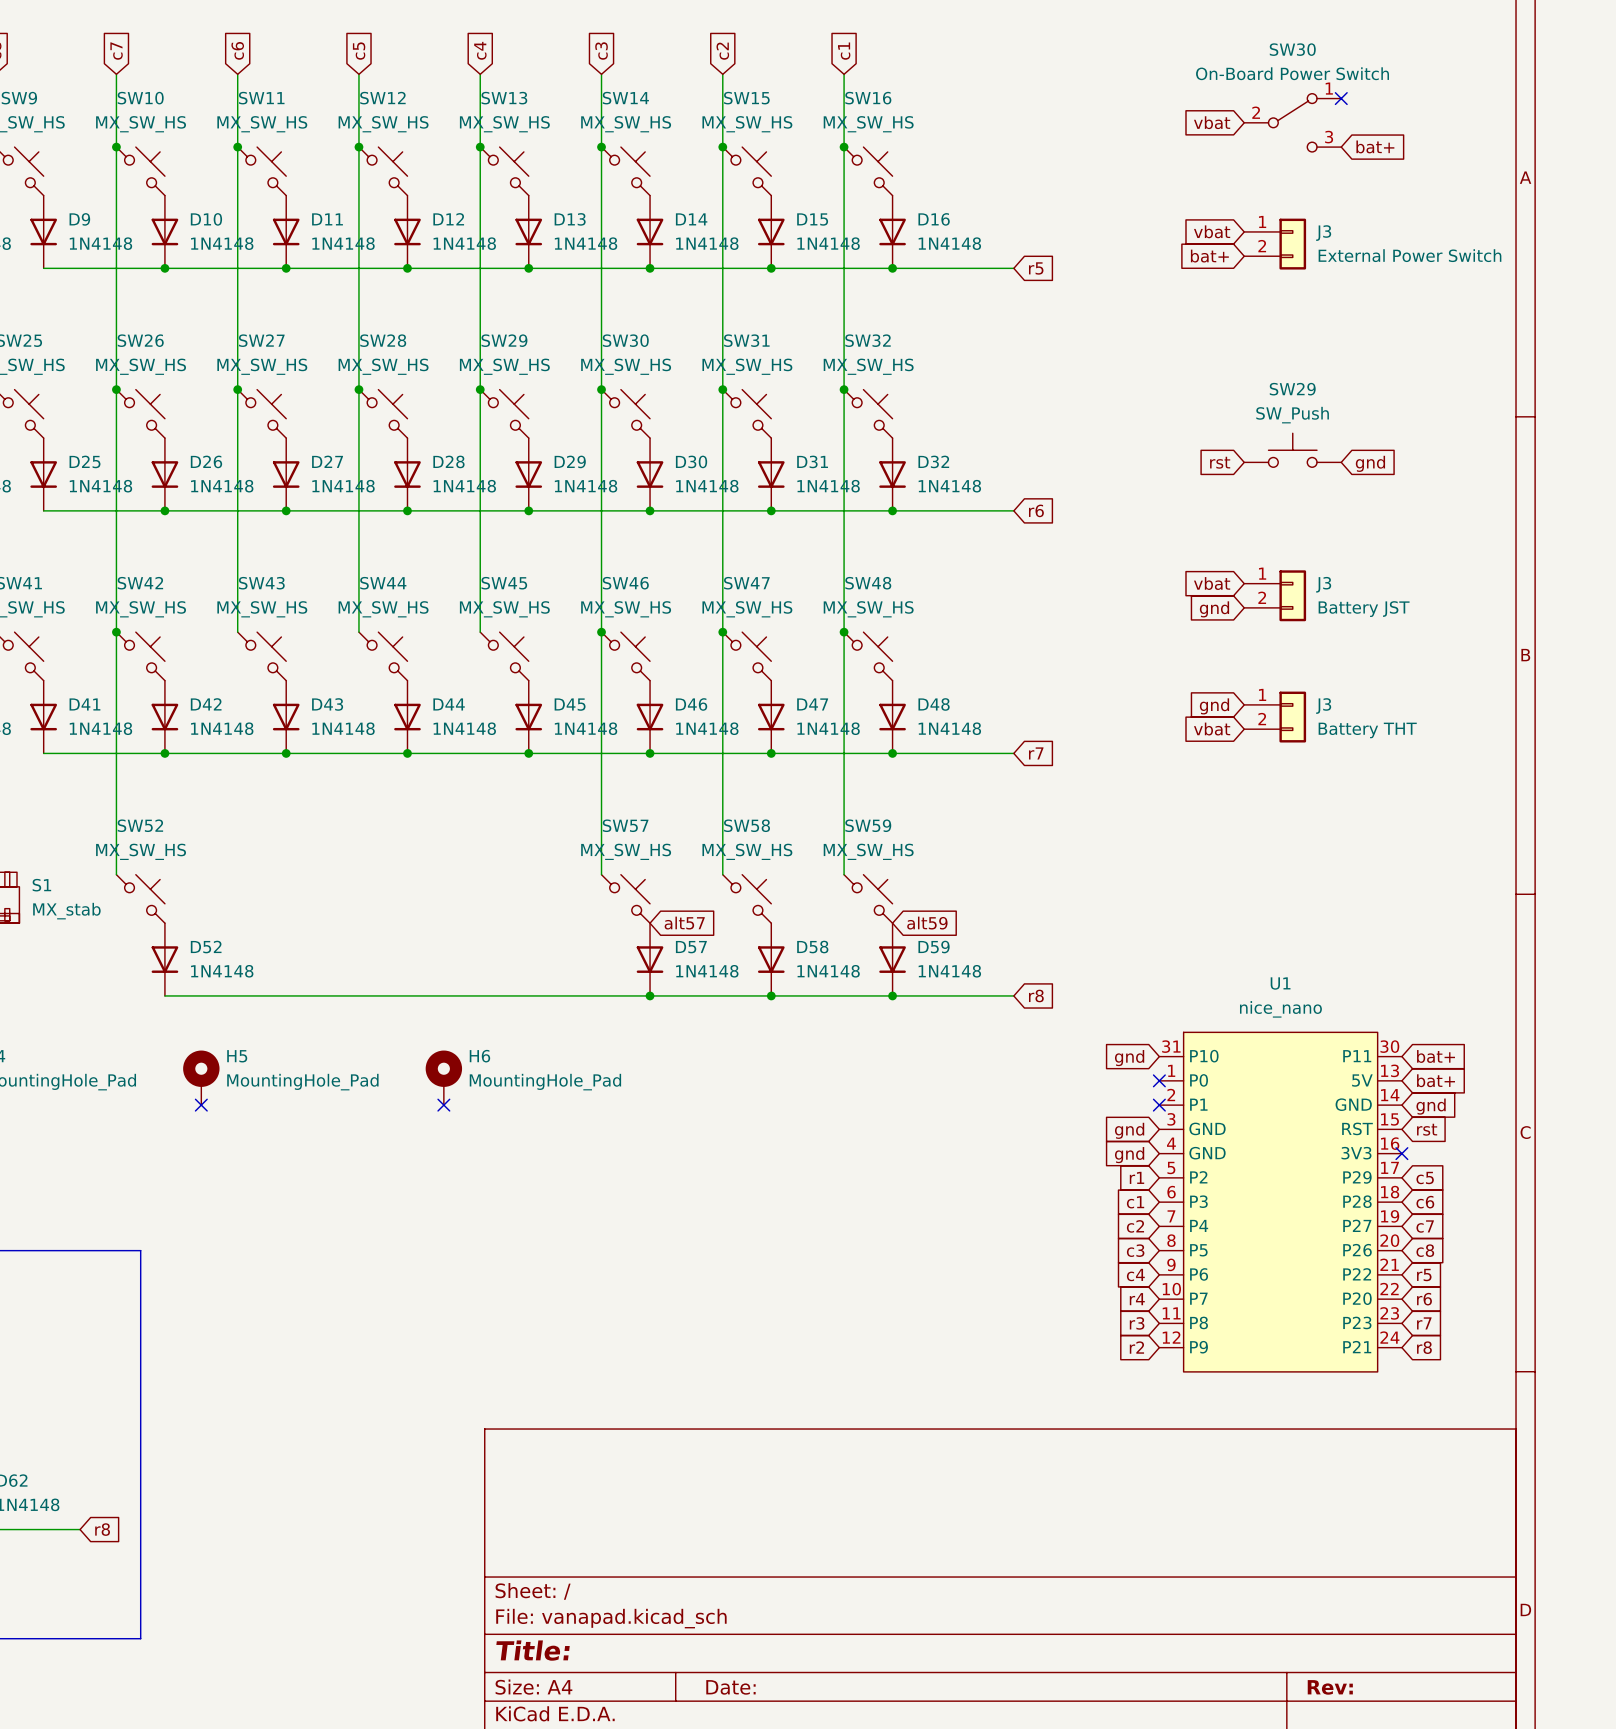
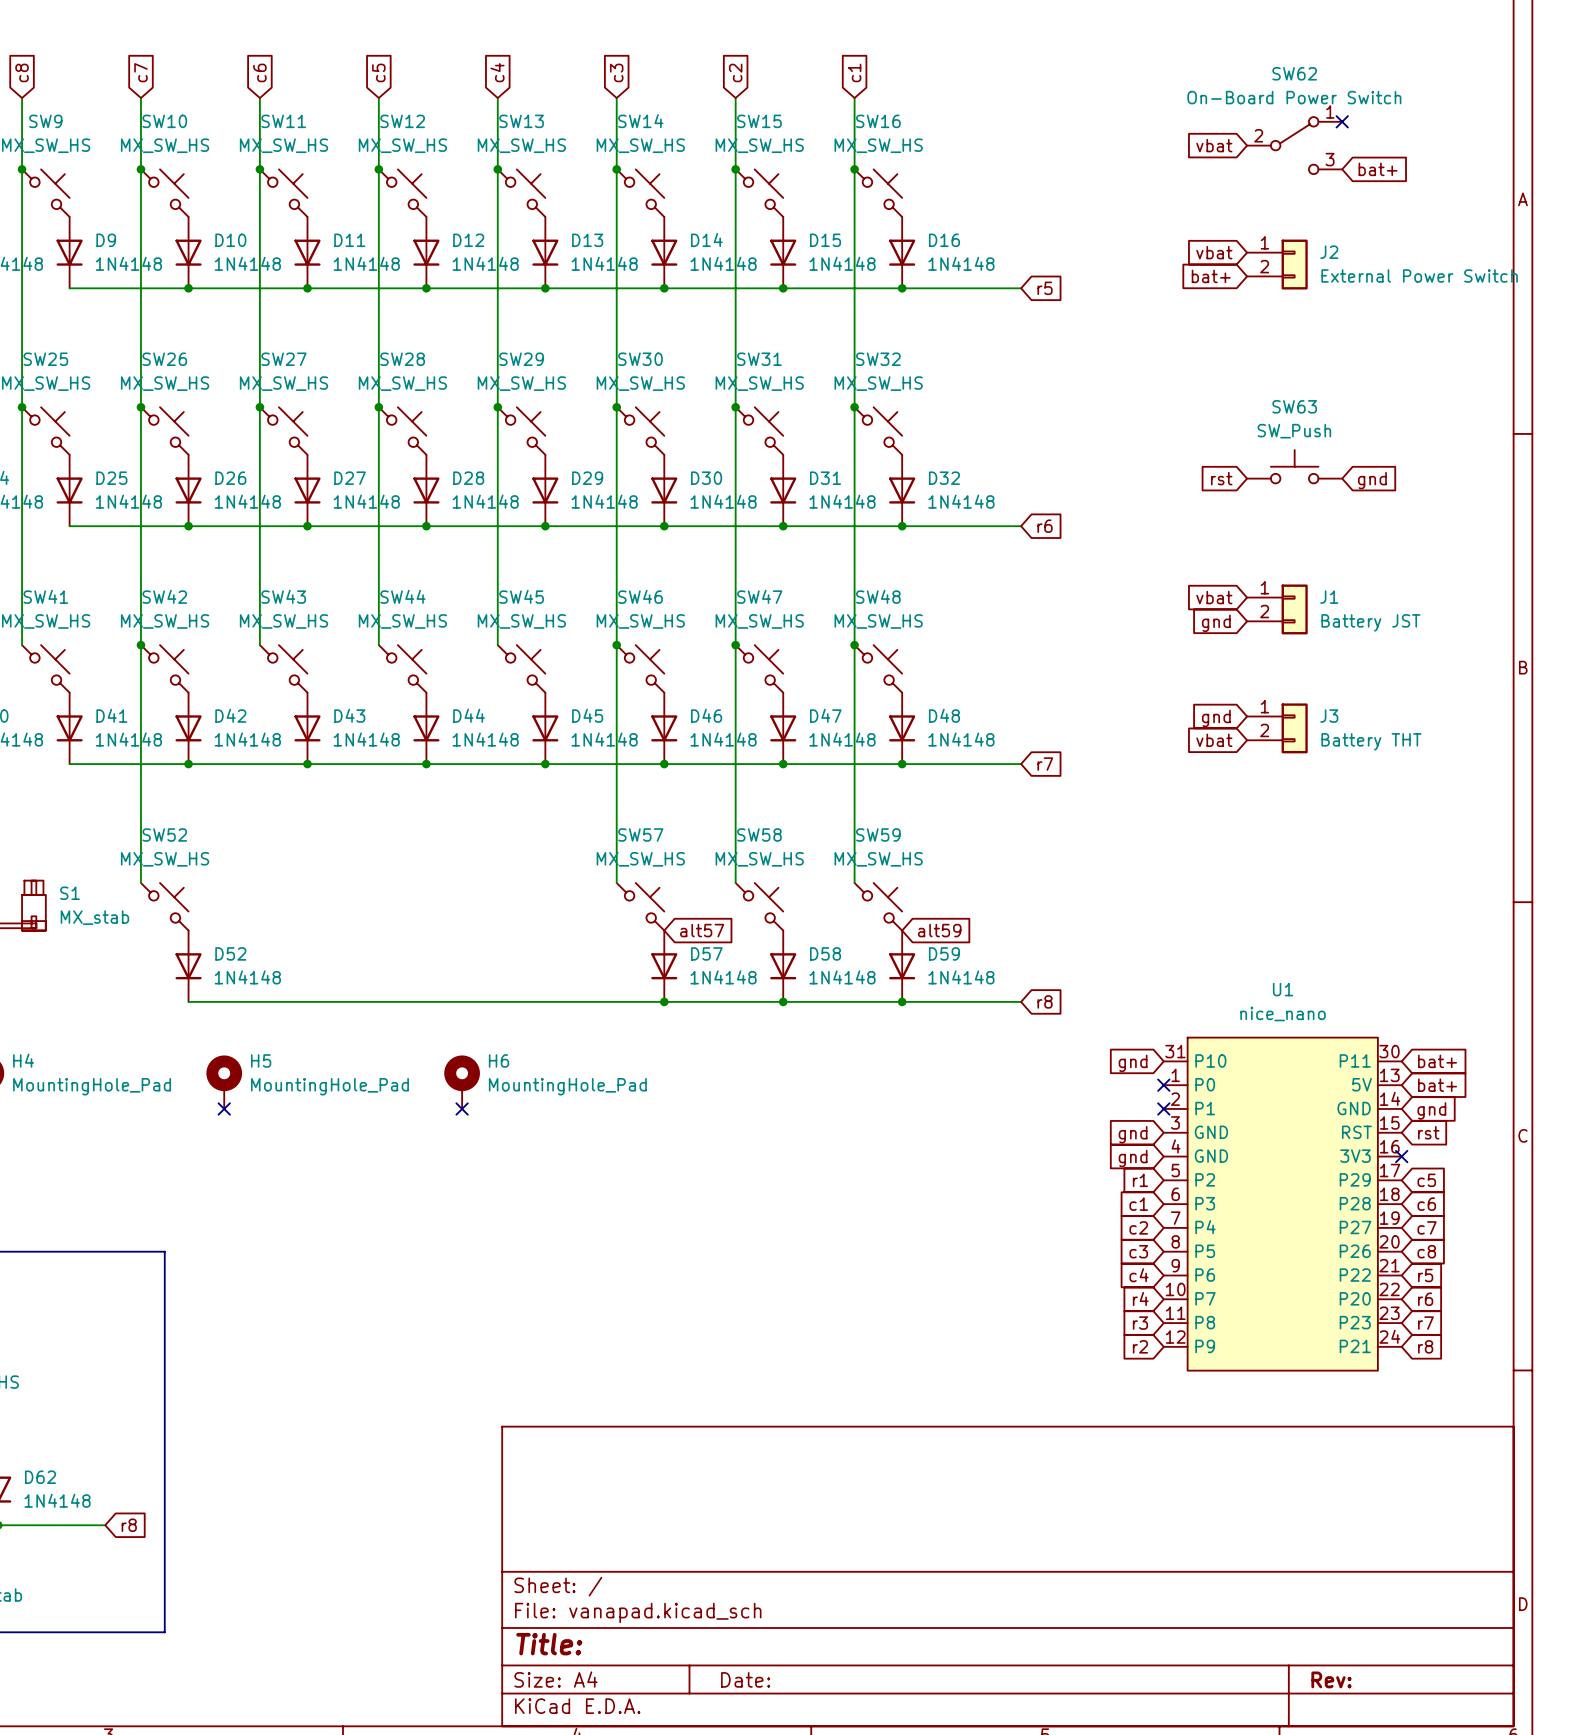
SW30 name: SW30 (1292, 49) -> SW62 (1294, 73)
J3 name: J3 (1323, 233) -> J2 (1329, 252)
SW29 name: SW29 (1292, 389) -> SW63 (1294, 406)
J3 name: J3 (1323, 584) -> J1 (1329, 597)

